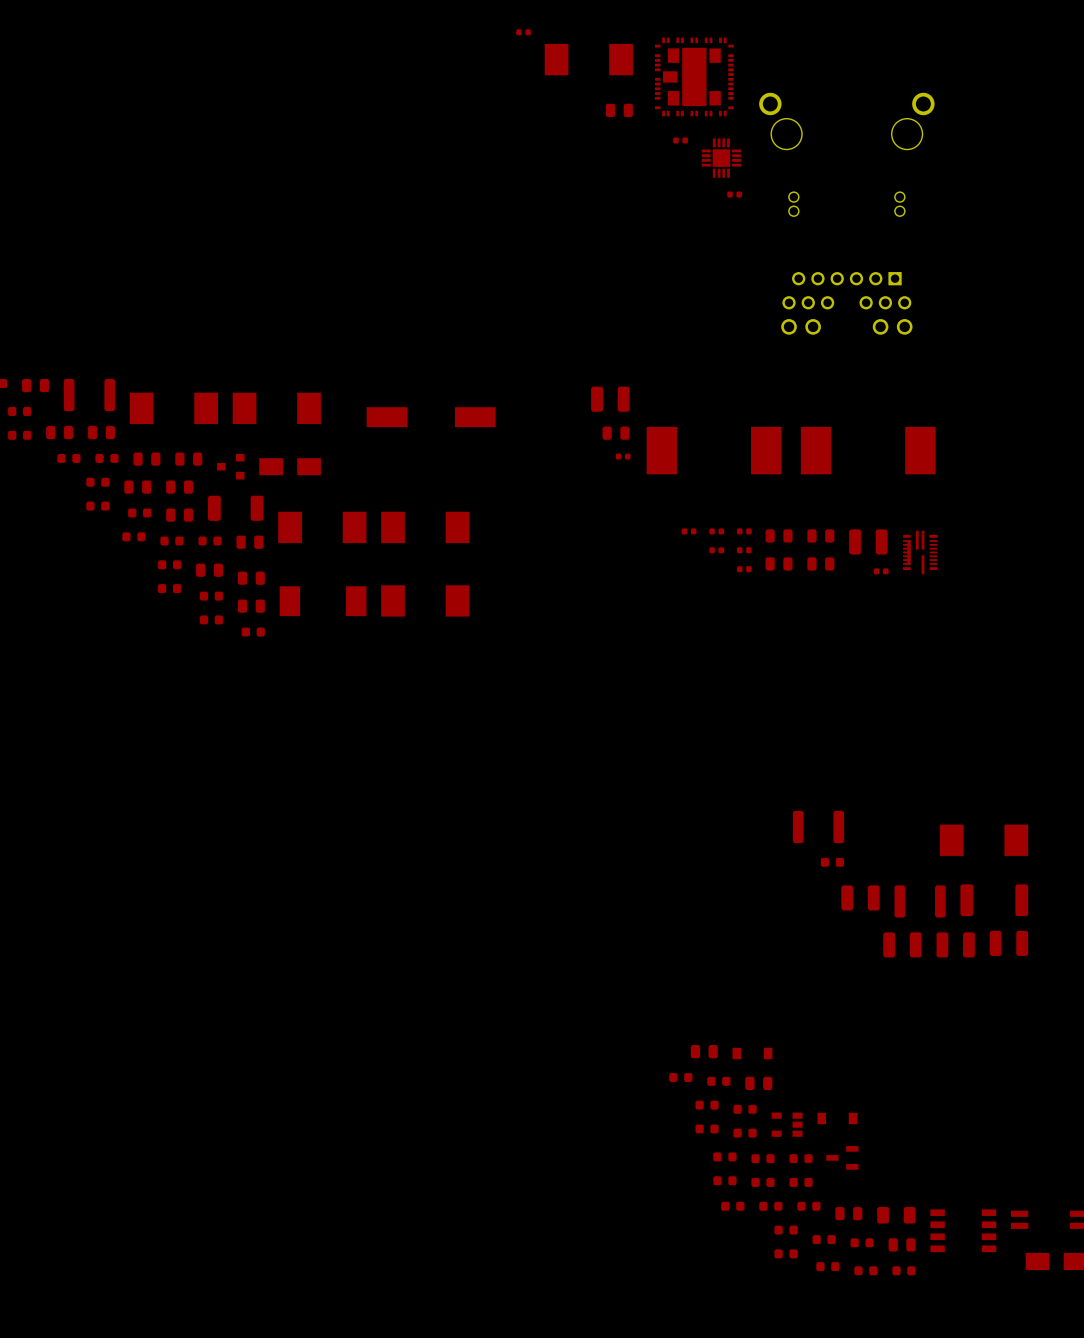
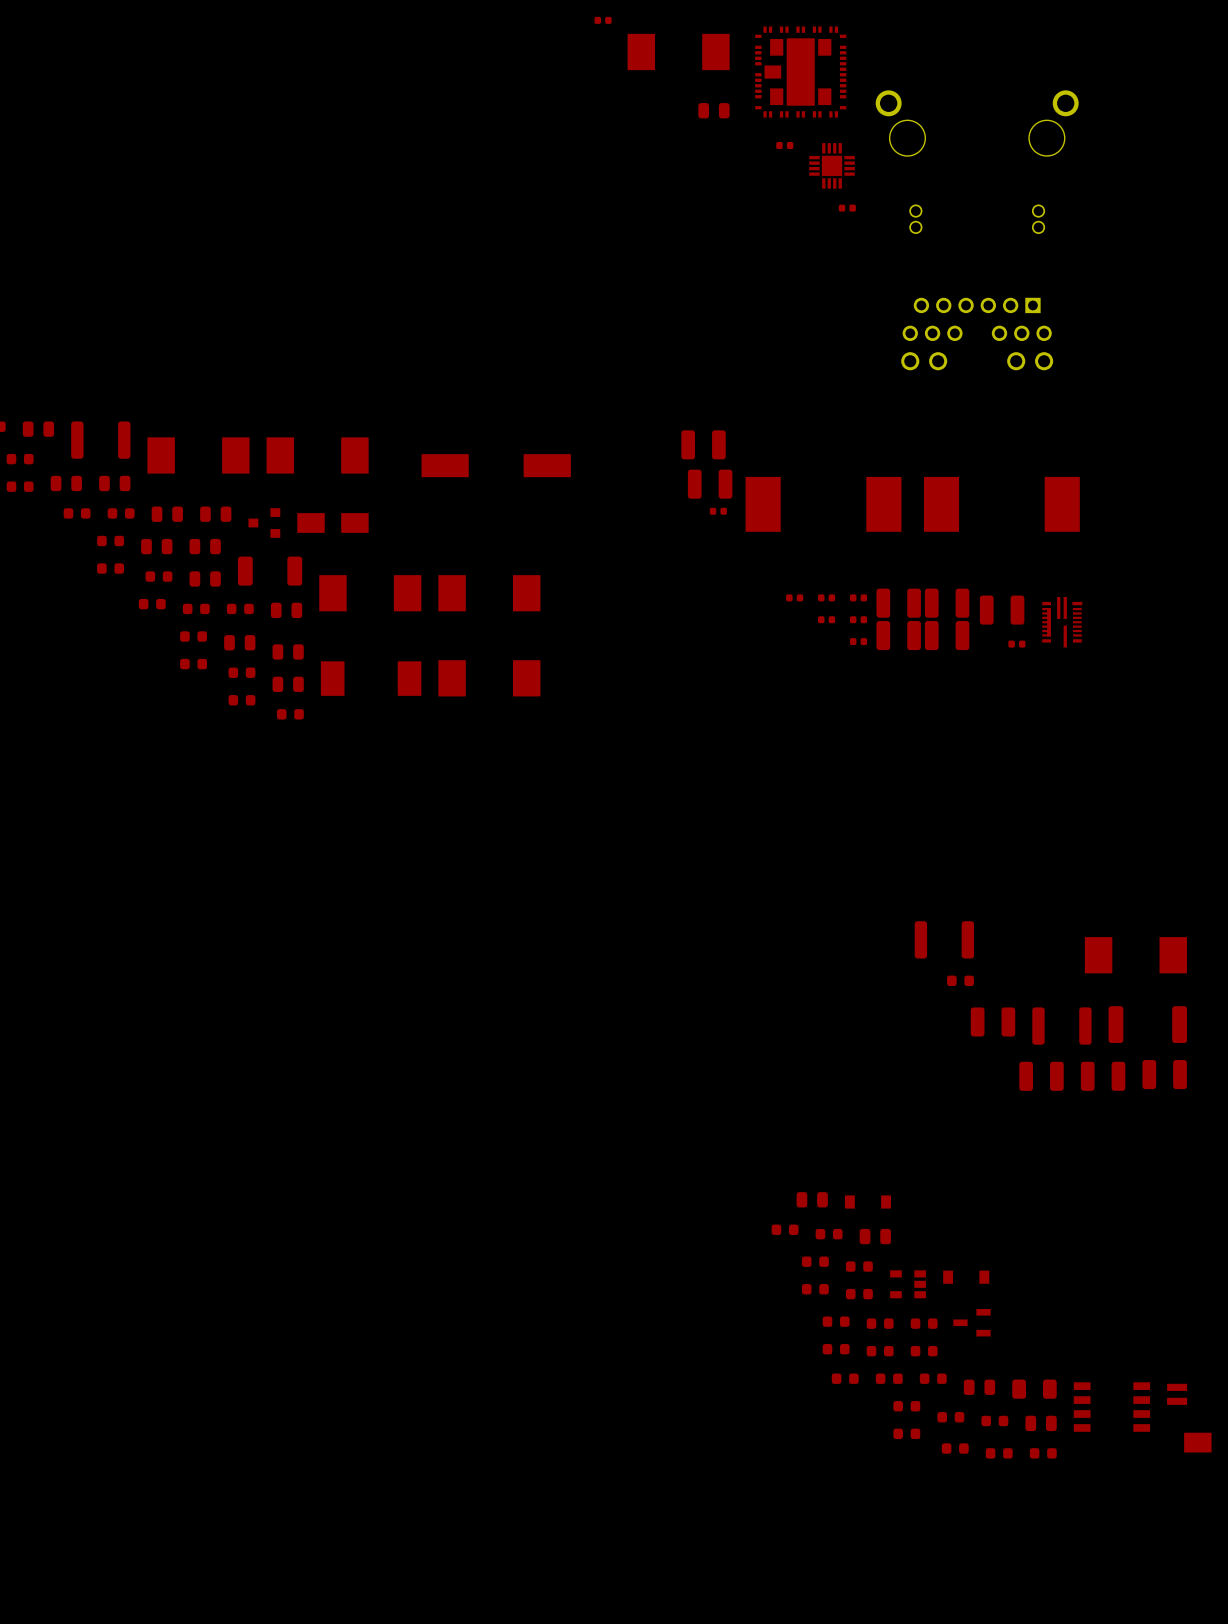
part footprint: [602, 426, 630, 440] -> [687, 469, 733, 499]
part footprint: [765, 529, 793, 543] -> [876, 588, 921, 618]
part footprint: [807, 529, 835, 543] -> [924, 588, 970, 618]
part footprint: [765, 557, 793, 571] -> [876, 620, 921, 651]
part footprint: [807, 557, 835, 571] -> [924, 620, 970, 651]

